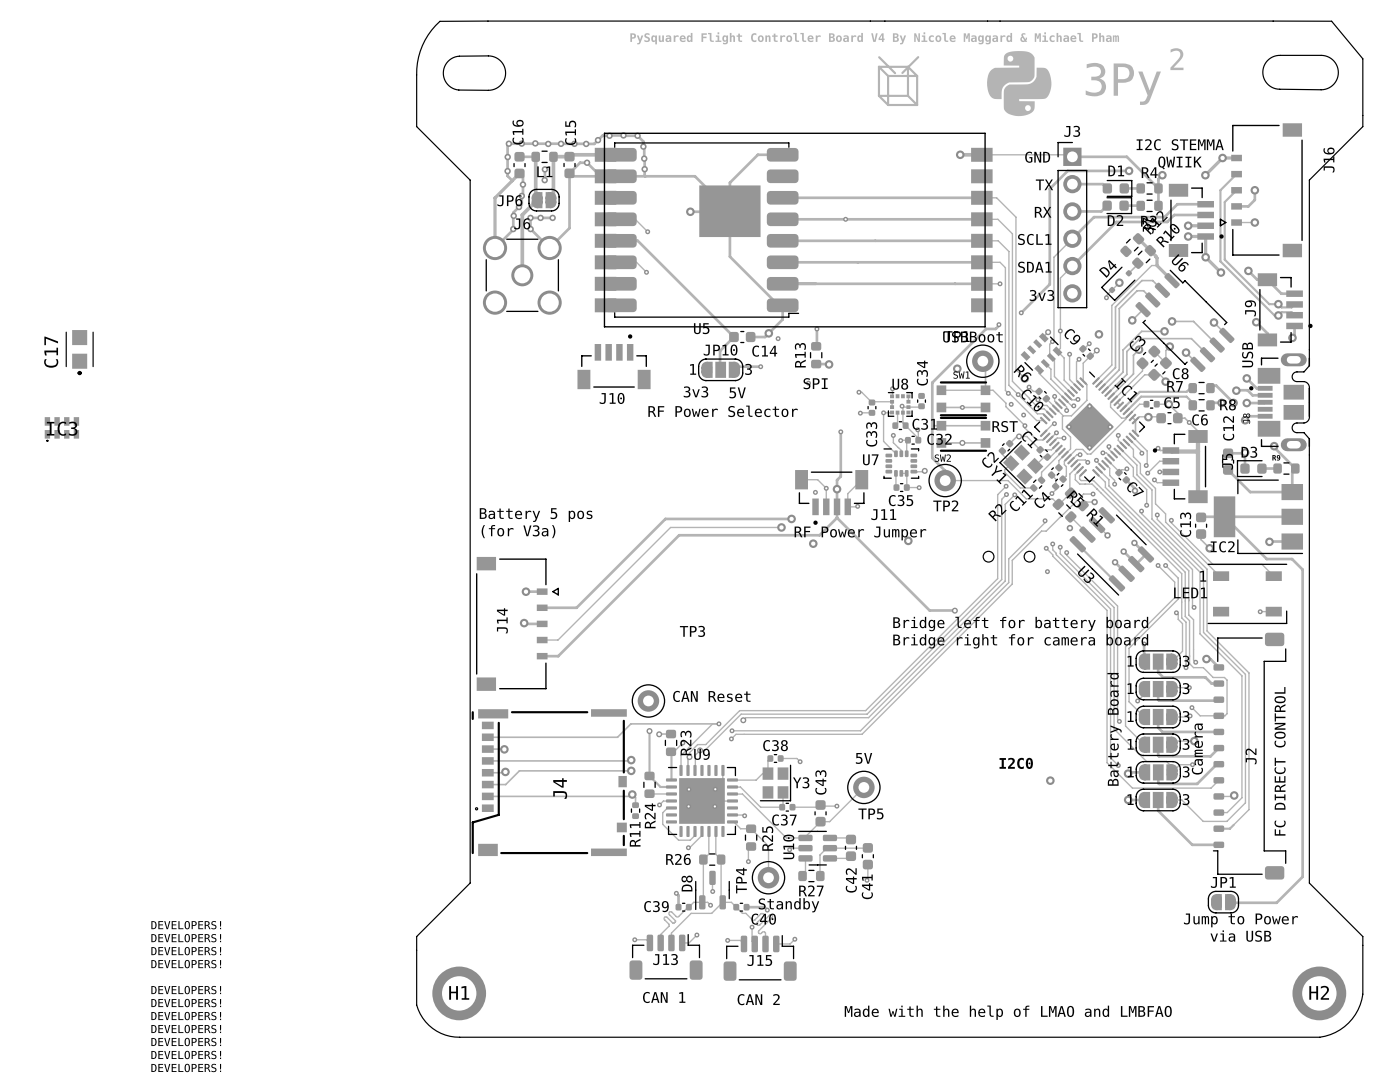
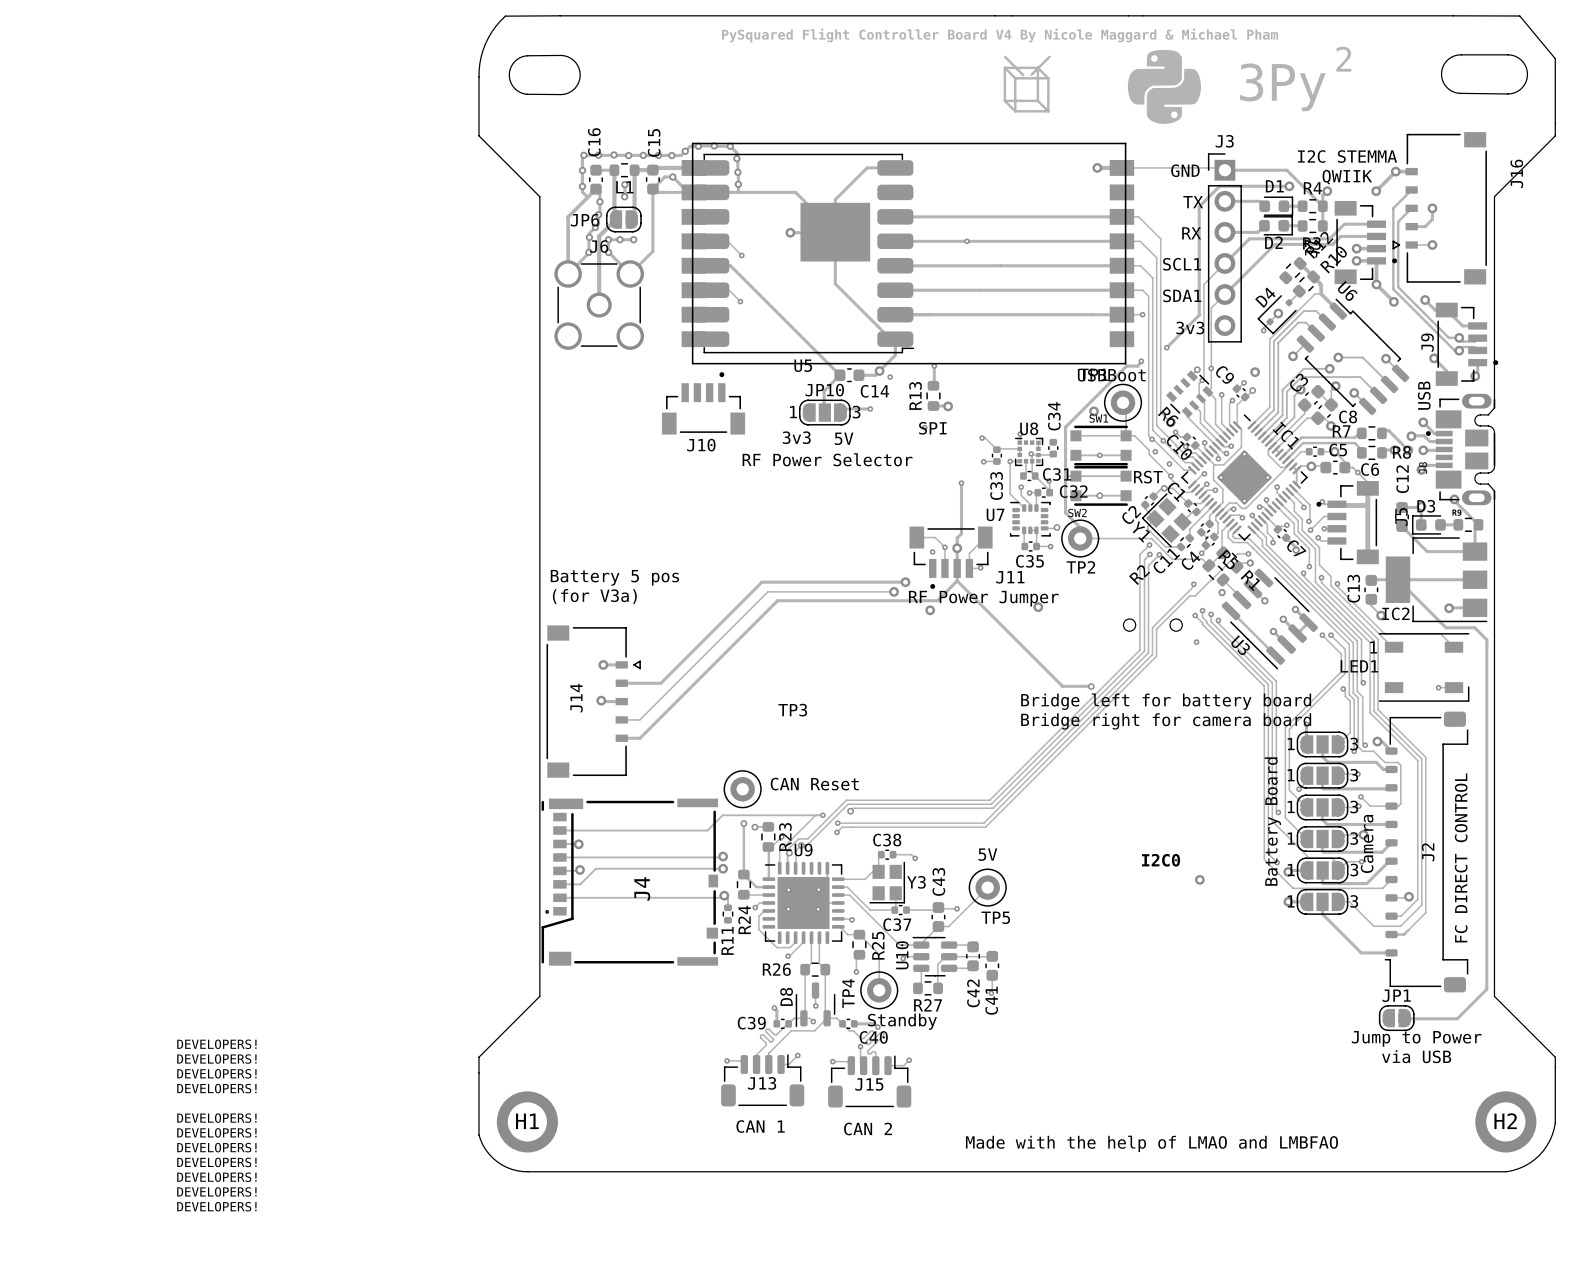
C17: (79, 352) -> none
IC3: (61, 429) -> none

